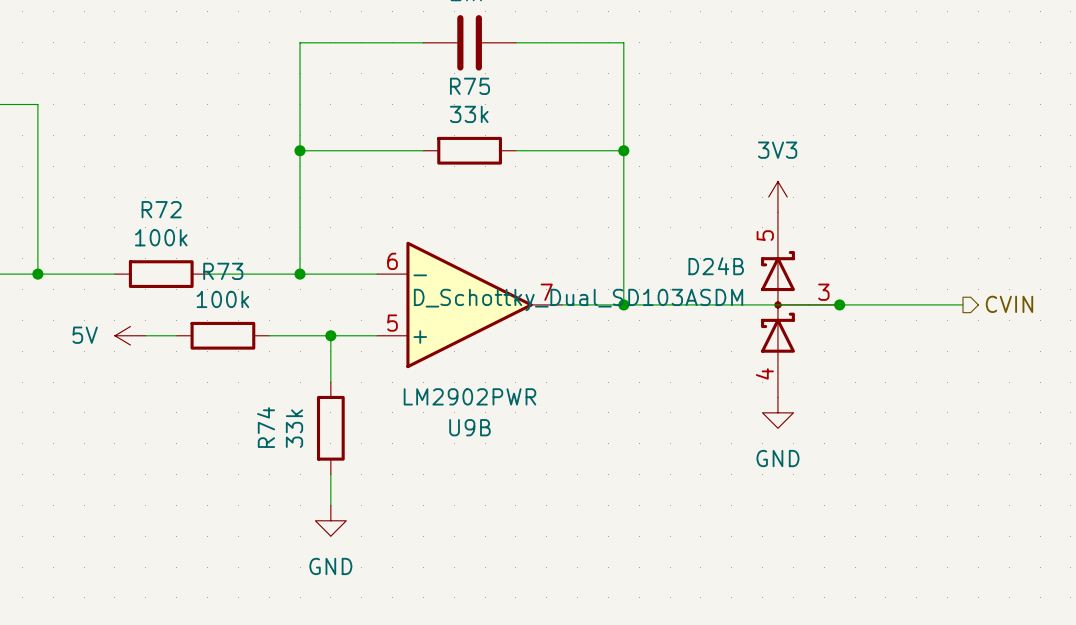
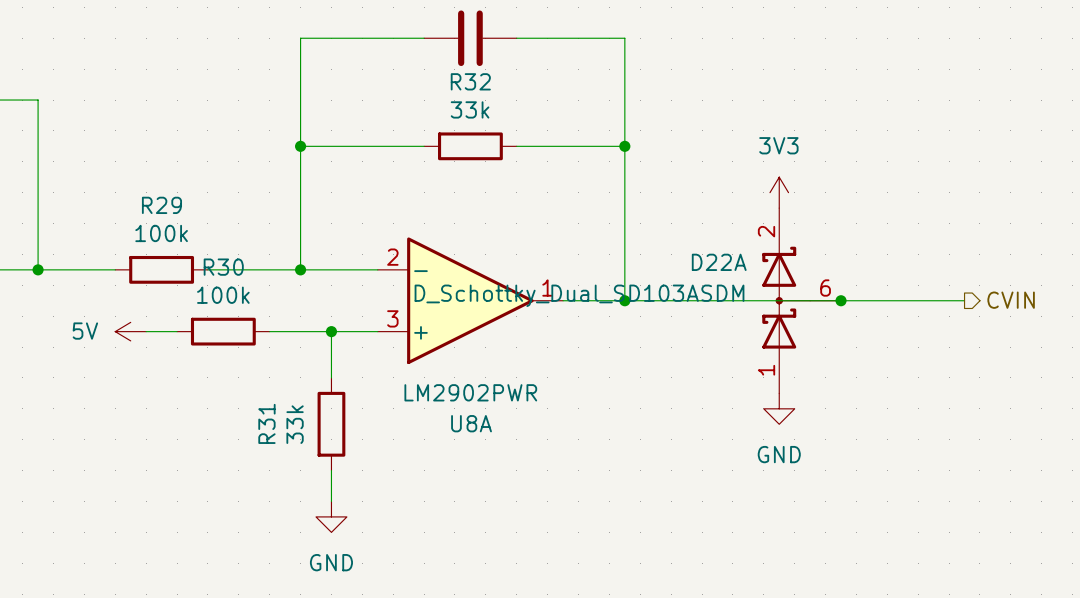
R75 name: R75 (469, 86) -> R32 (470, 81)
R72 name: R72 (161, 209) -> R29 (161, 205)
D24B pin number: 5 (765, 235) -> 2 (766, 231)
U9B pin number: 6 (392, 261) -> 2 (392, 257)
D24B name: D24B (716, 266) -> D22A (719, 262)
R73 name: R73 (223, 271) -> R30 (223, 267)
U9B pin number: 7 (546, 292) -> 1 (547, 288)
D24B pin number: 3 (823, 292) -> 6 (825, 288)
U9B pin number: 5 (392, 323) -> 3 (392, 318)
D24B pin number: 4 (764, 373) -> 1 (766, 370)
R74 name: R74 (266, 427) -> R31 (266, 423)
U9B name: U9B (469, 427) -> U8A (471, 423)

